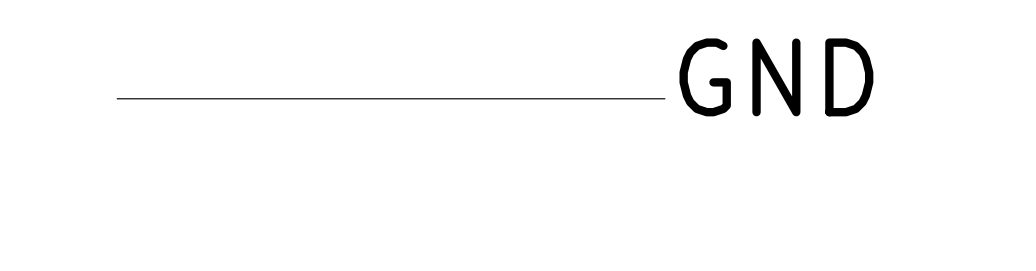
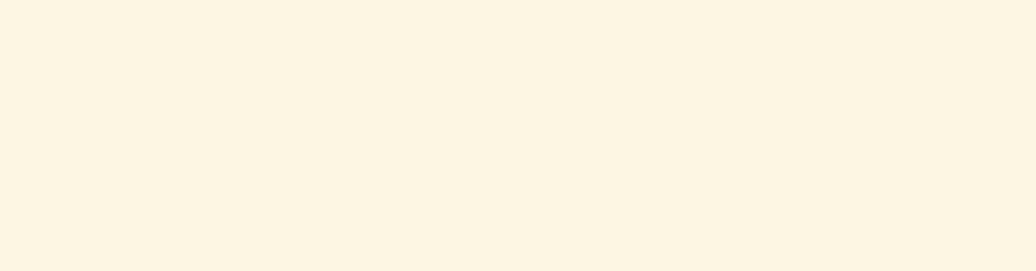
label: GND (776, 77) -> none
wire: (117, 98) (664, 98) -> none

